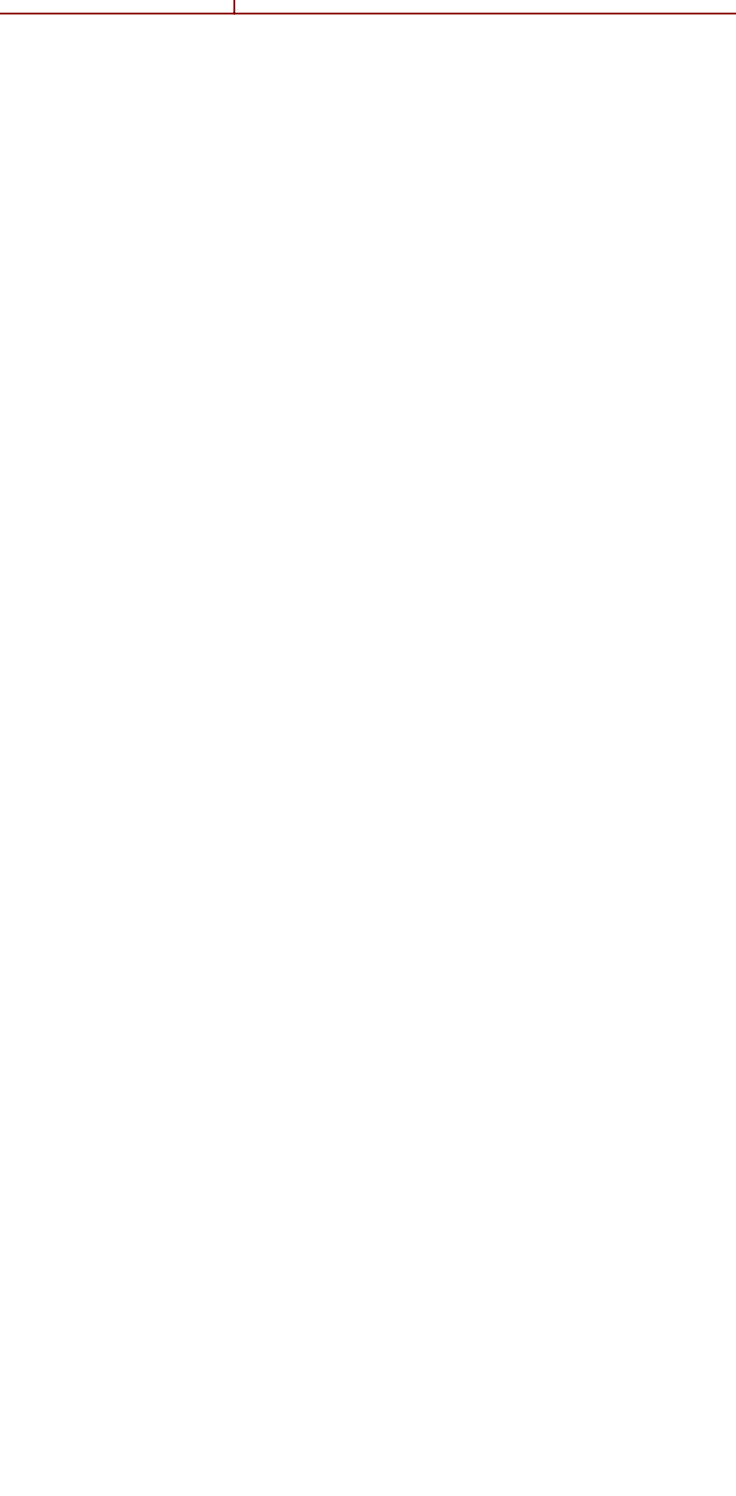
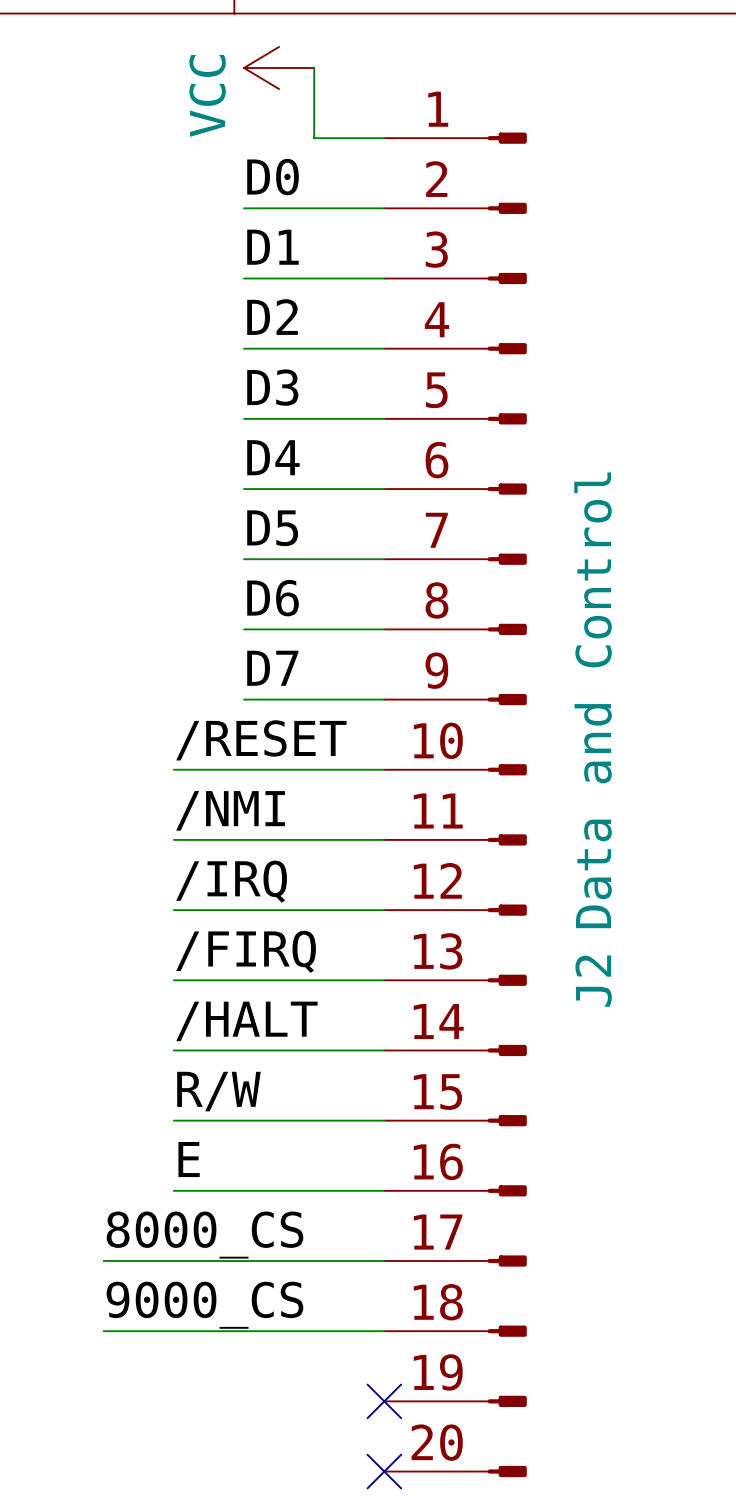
power symbol: none -> VCC (279, 67)
wire: none -> (314, 67) (314, 138) (384, 138)
label: none -> D0 (273, 177)
wire: none -> (243, 208) (384, 208)
label: none -> D1 (272, 247)
wire: none -> (243, 278) (384, 278)
label: none -> D2 (272, 317)
wire: none -> (243, 348) (384, 348)
label: none -> D3 (272, 387)
wire: none -> (243, 418) (384, 418)
label: none -> D4 (273, 457)
wire: none -> (243, 489) (384, 489)
label: none -> D5 (272, 528)
wire: none -> (243, 559) (384, 559)
label: none -> D6 (273, 598)
wire: none -> (243, 629) (384, 629)
label: none -> D7 (272, 668)
wire: none -> (243, 699) (384, 699)
label: none -> /RESET (261, 740)
wire: none -> (173, 769) (384, 769)
J2: none -> Data and Control (455, 804)
label: none -> /NMI (230, 810)
wire: none -> (173, 839) (384, 839)
label: none -> /IRQ (231, 881)
wire: none -> (173, 910) (384, 910)
label: none -> /FIRQ (246, 951)
wire: none -> (173, 980) (384, 980)
label: none -> /HALT (246, 1021)
wire: none -> (173, 1050) (384, 1050)
label: none -> R/W (218, 1091)
wire: none -> (173, 1120) (384, 1120)
label: none -> E (189, 1159)
wire: none -> (173, 1190) (384, 1190)
label: none -> 8000_CS (205, 1235)
wire: none -> (103, 1261) (384, 1261)
label: none -> 9000_CS (204, 1305)
wire: none -> (103, 1331) (384, 1331)
no-connect mark: none -> (384, 1401)
no-connect mark: none -> (384, 1471)

